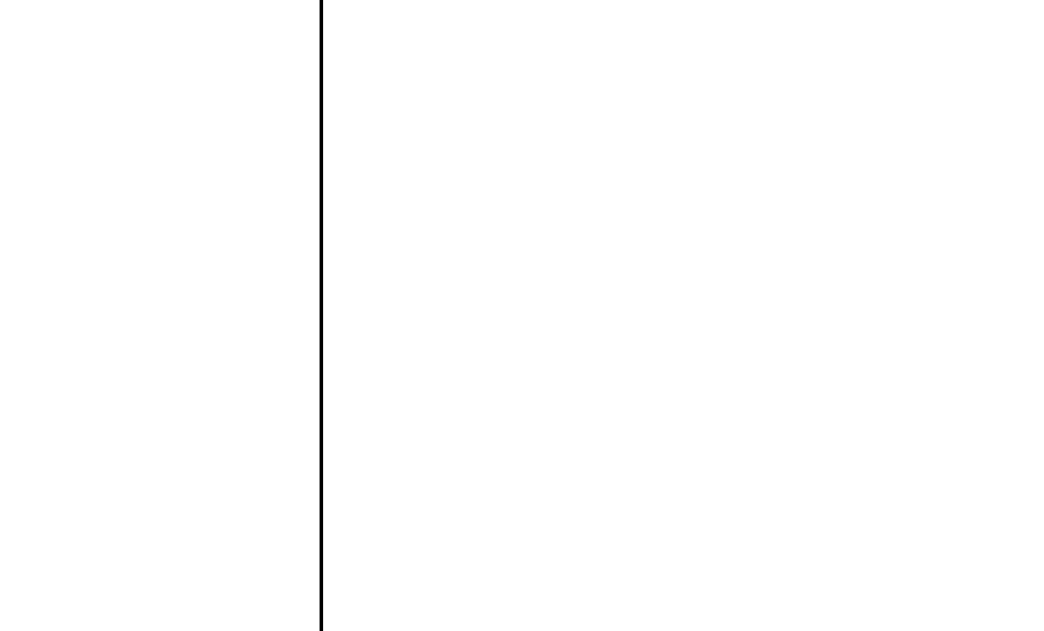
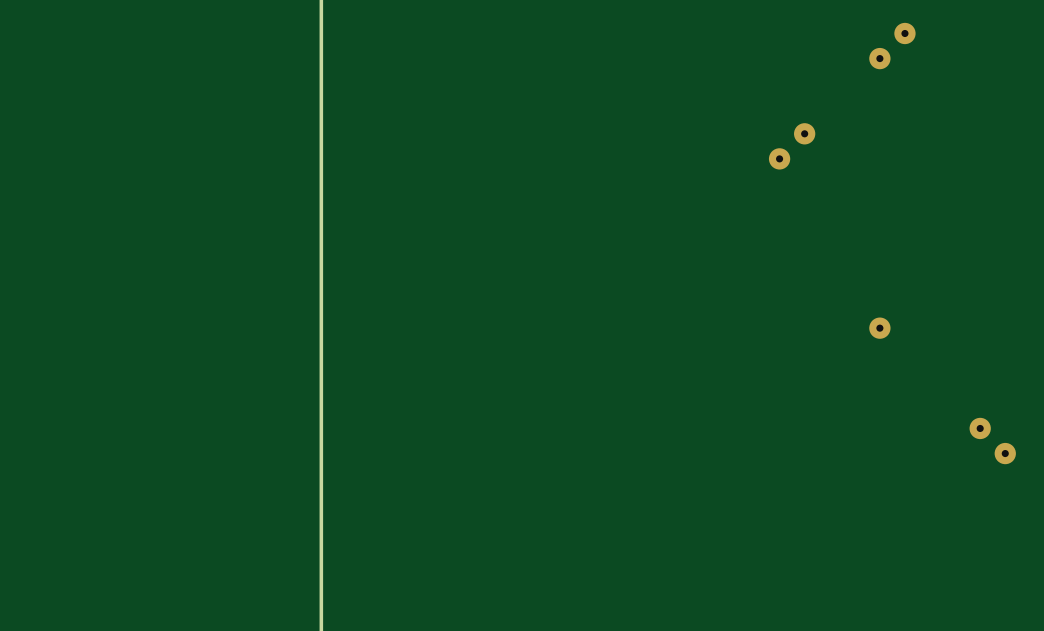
via: none -> (904, 33)
via: none -> (879, 58)
via: none -> (804, 133)
via: none -> (779, 158)
via: none -> (879, 328)
via: none -> (980, 428)
via: none -> (1005, 453)

